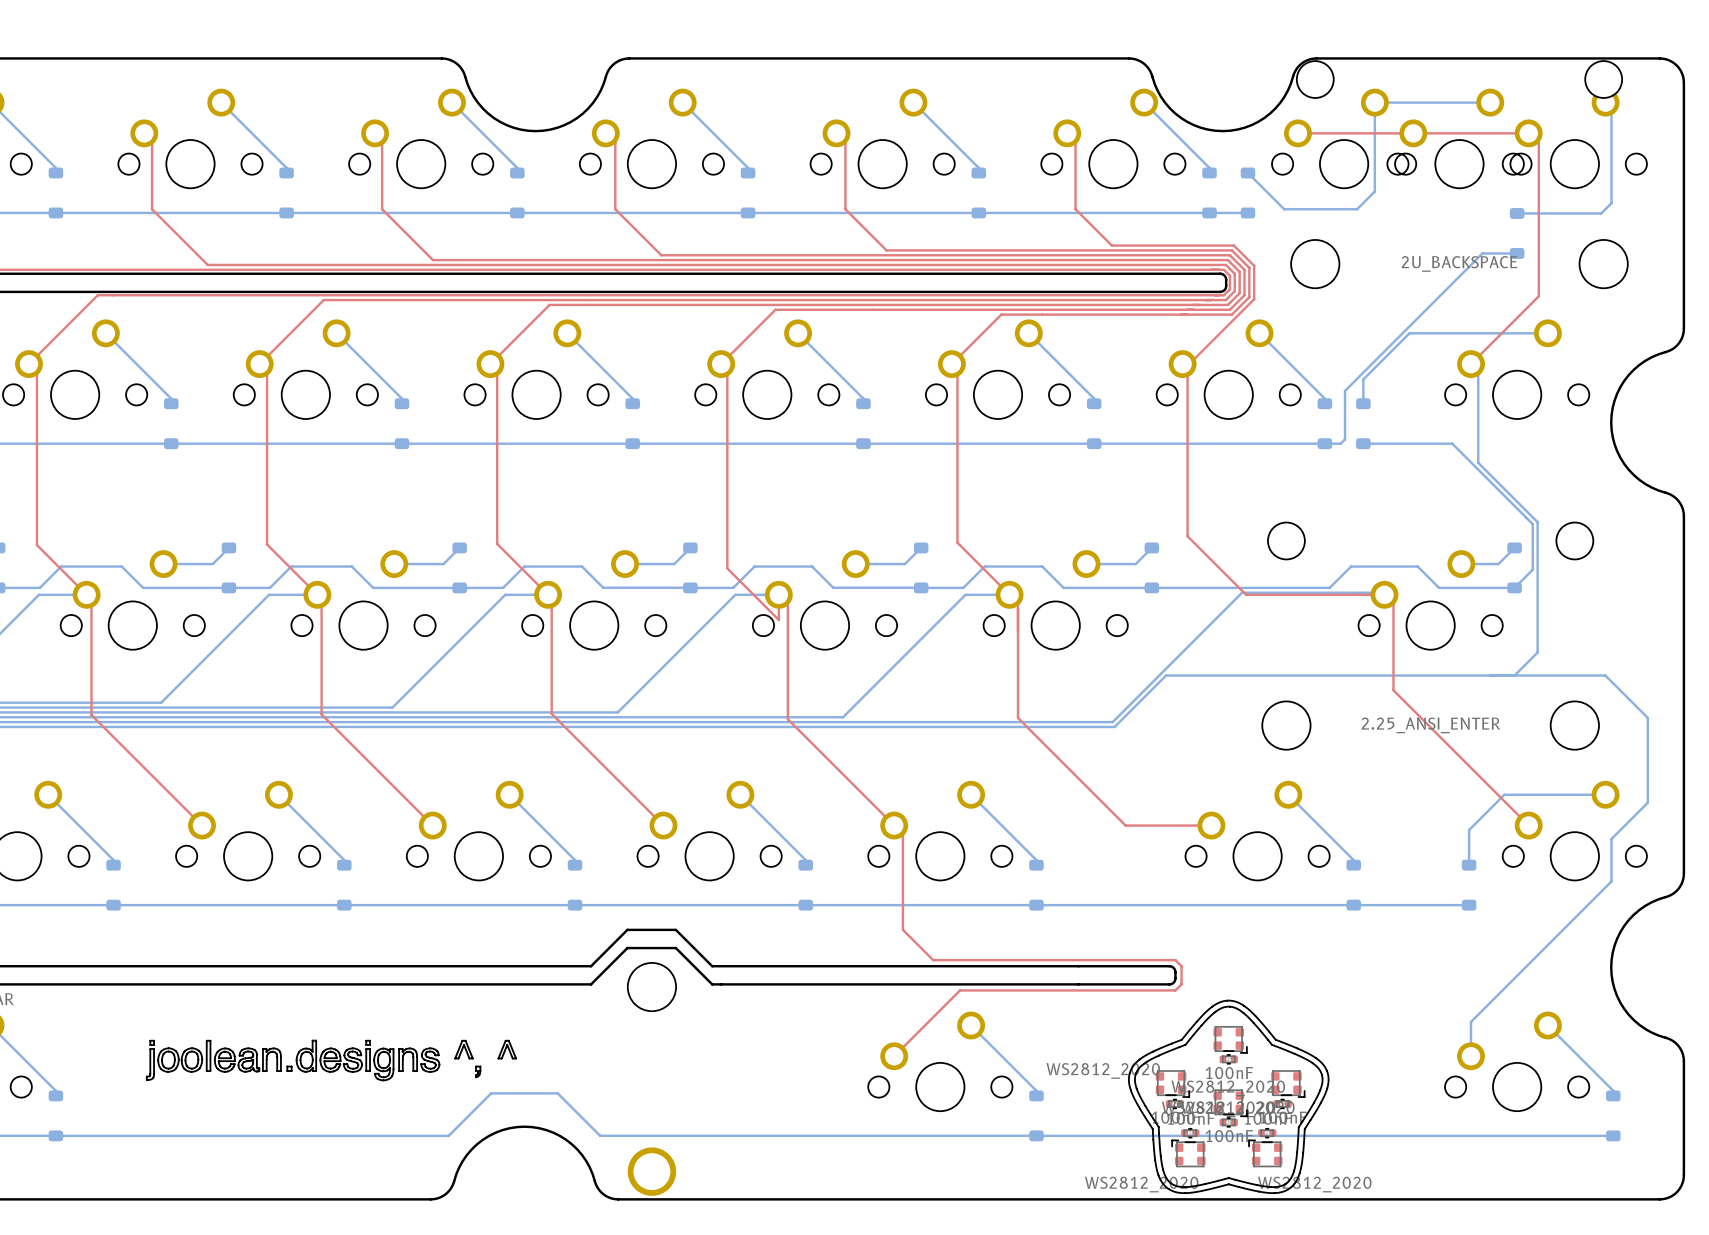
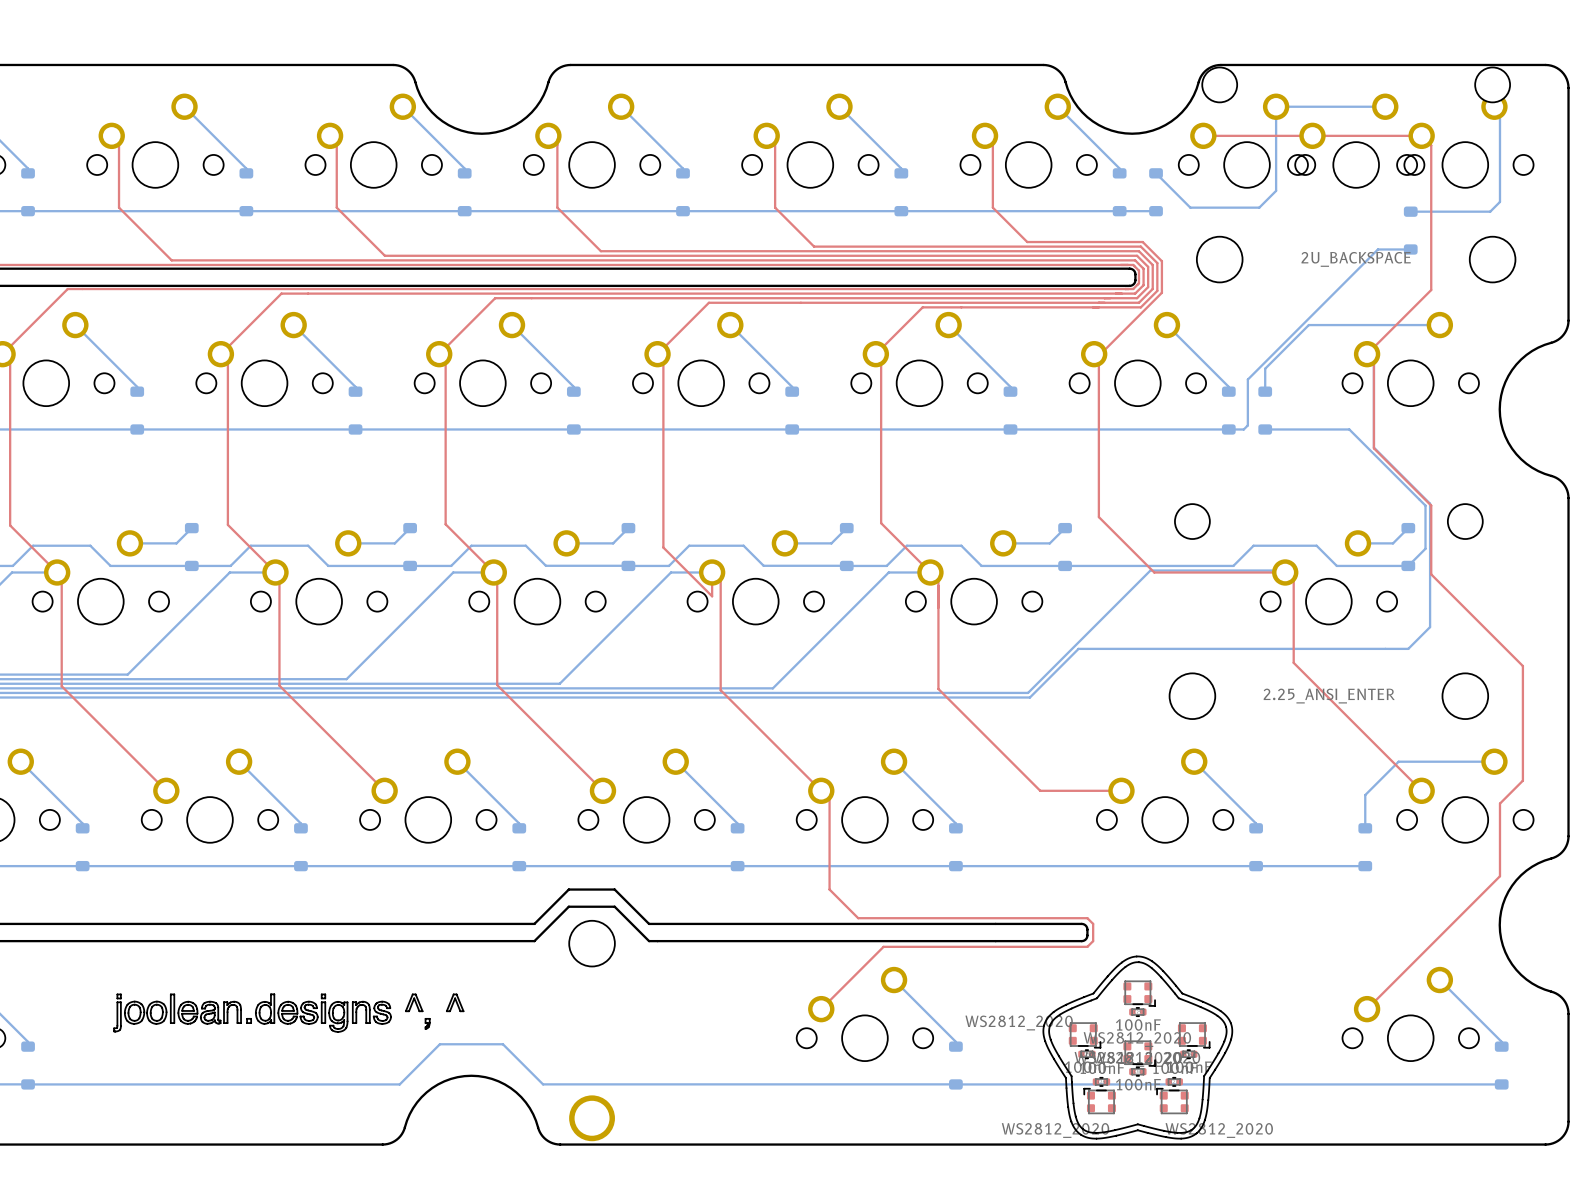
top track: none -> (1367, 354) (1373, 361) (1373, 448) (1431, 505) (1431, 574) (1522, 666) (1522, 780) (1499, 803) (1499, 876) (1367, 1009)
bottom track: (1514, 675) (1605, 675) (1647, 717) (1647, 802) (1611, 839) (1611, 881) (1471, 1021) (1471, 1056) -> none

